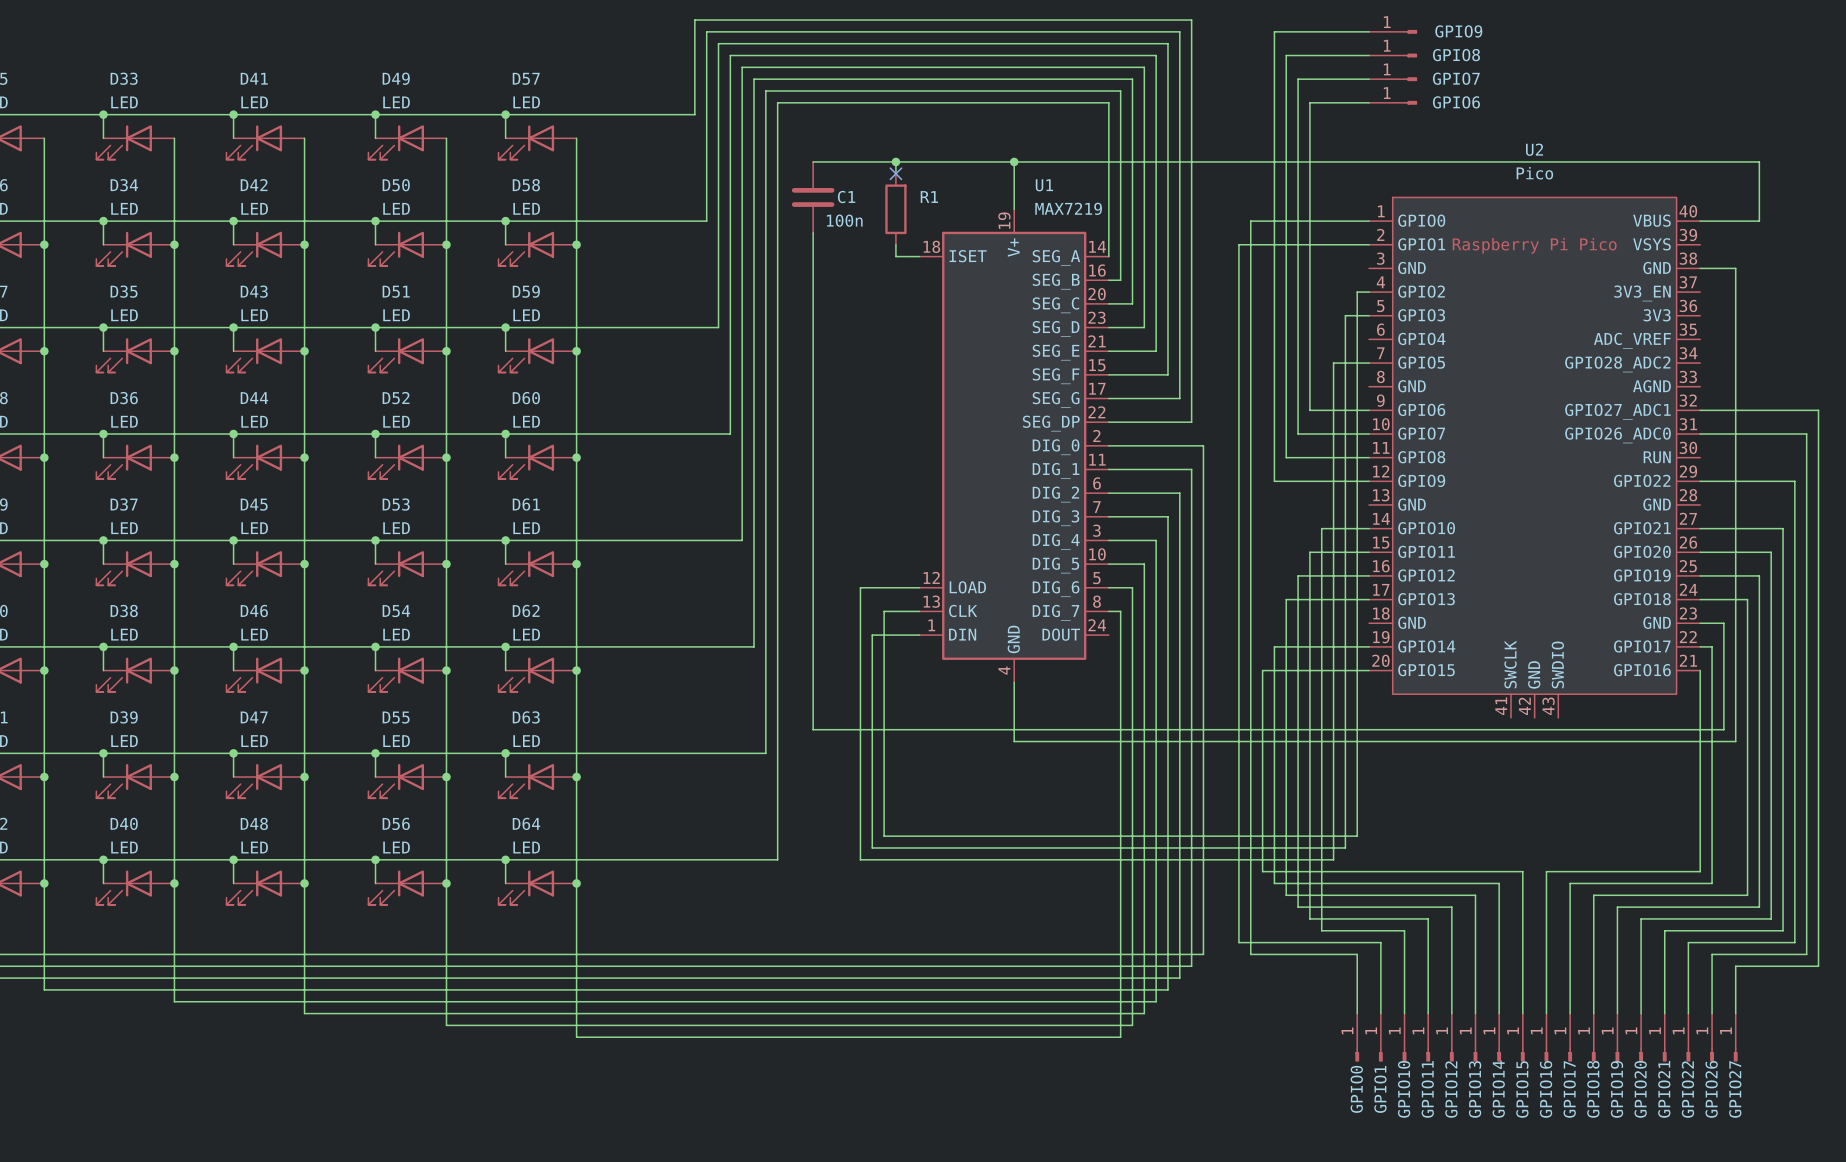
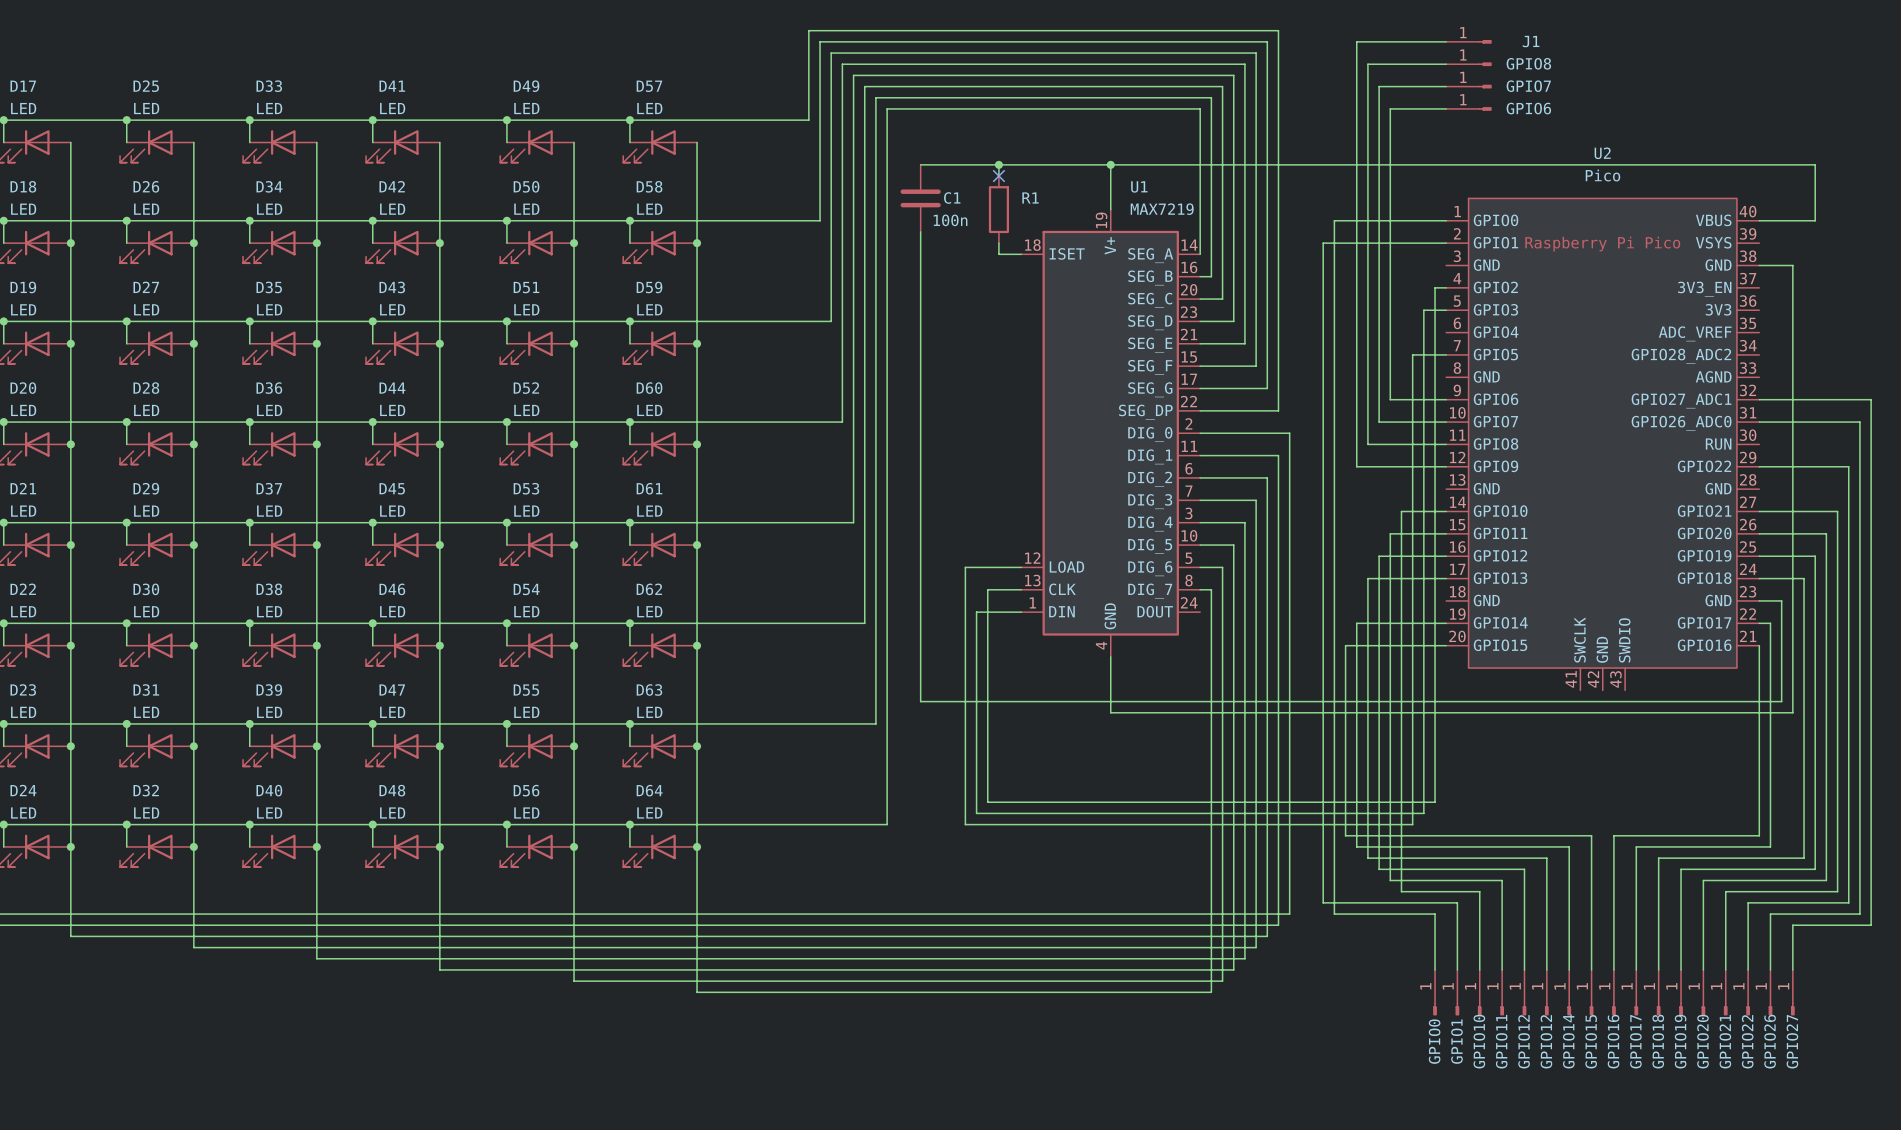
GPIO9 name: GPIO9 (1458, 31) -> J1 (1531, 41)
GPIO13 name: GPIO13 (1475, 1089) -> GPIO12 (1546, 1041)

